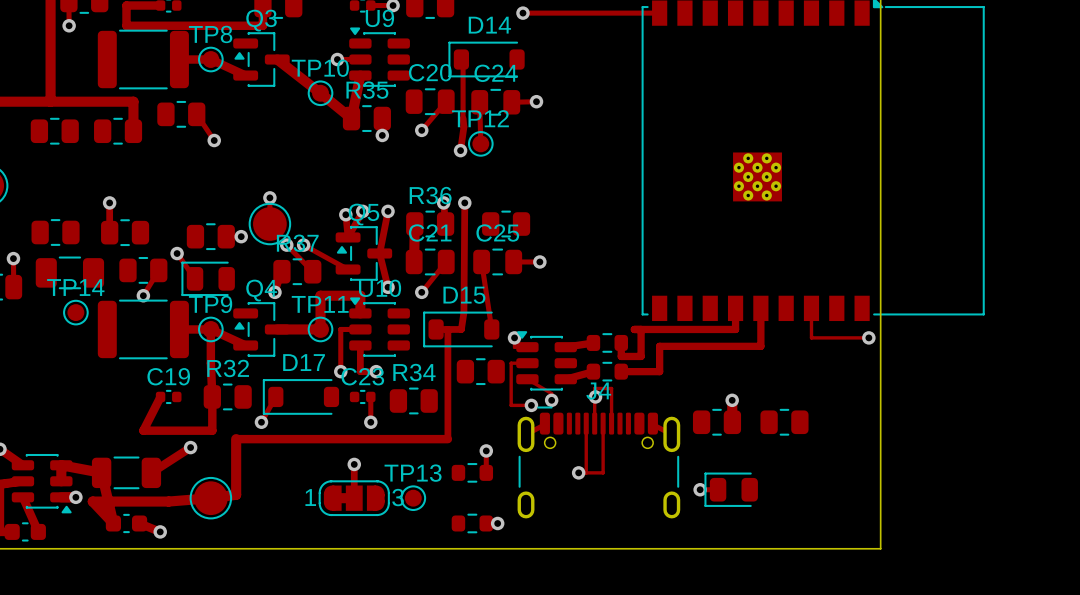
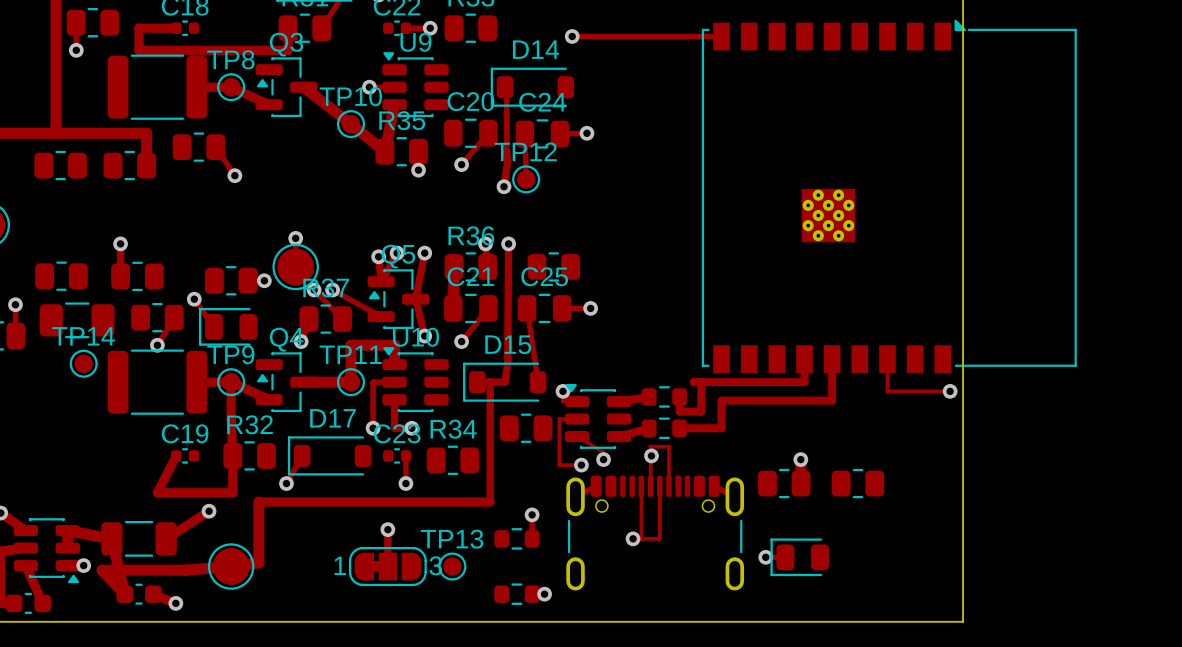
J4: (598, 462) -> none
part: none -> (655, 533)

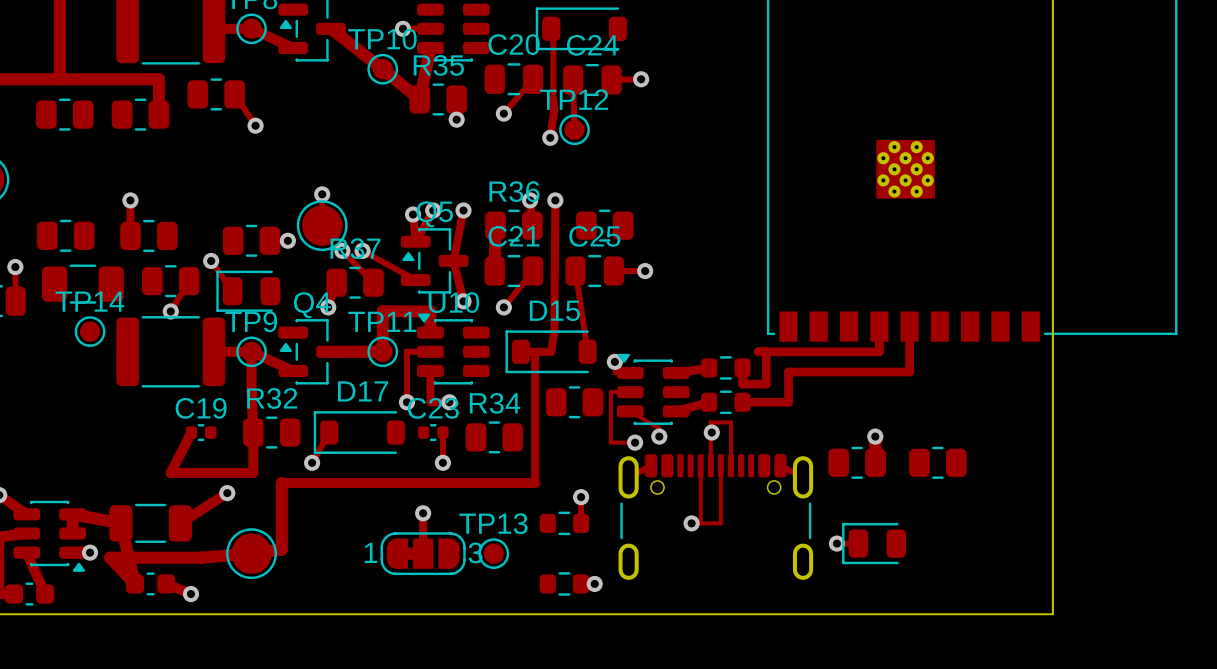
track: (887, 359) (887, 391) (950, 391) -> none
via: (950, 391) -> none

